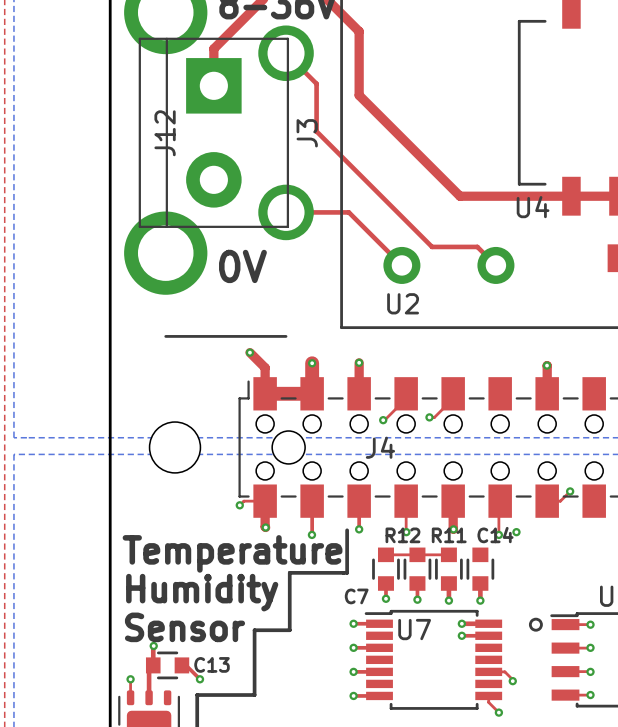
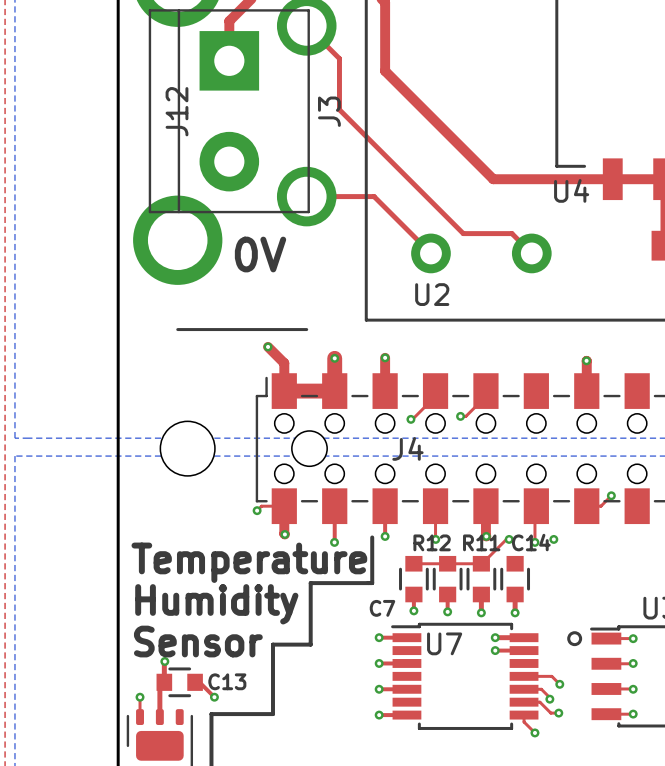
top track: none -> (509, 539) (506, 539) (481, 563)
via: none -> (509, 539)
top track: none -> (524, 676) (551, 676) (559, 684)
via: none -> (559, 684)
top track: none -> (524, 702) (539, 702) (550, 713) (558, 713)
via: none -> (558, 713)

